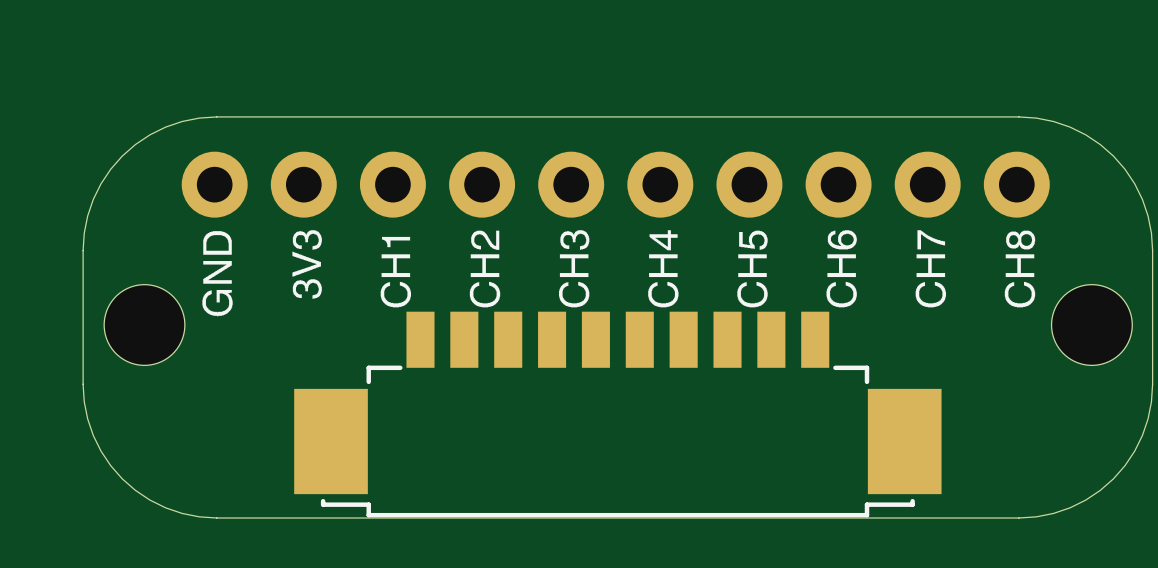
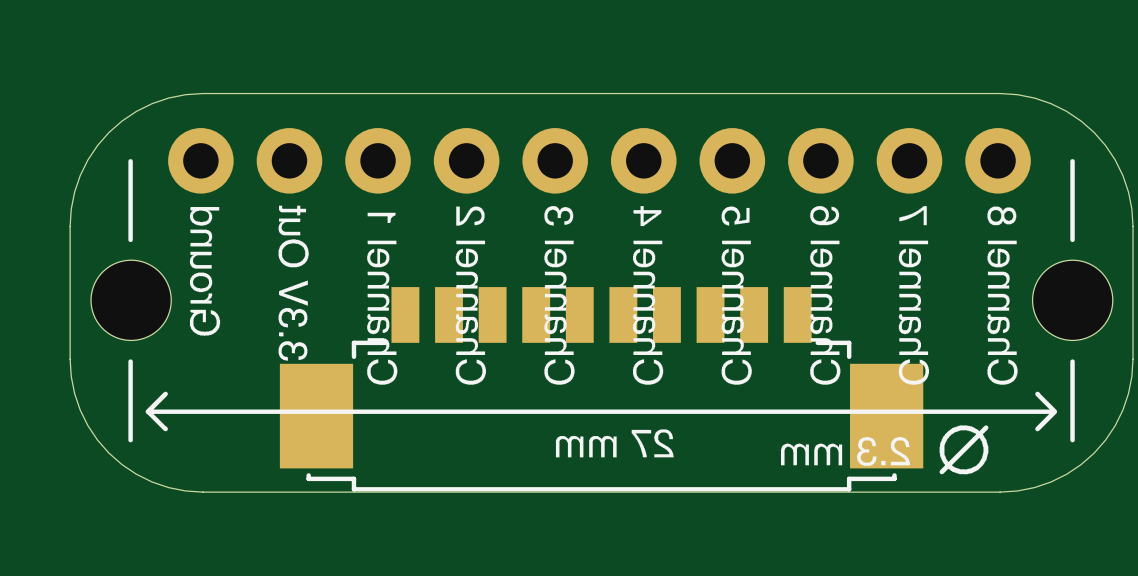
drawing: none -> [128, 159, 1075, 475]
drawing: [202, 230, 1036, 317] -> none

